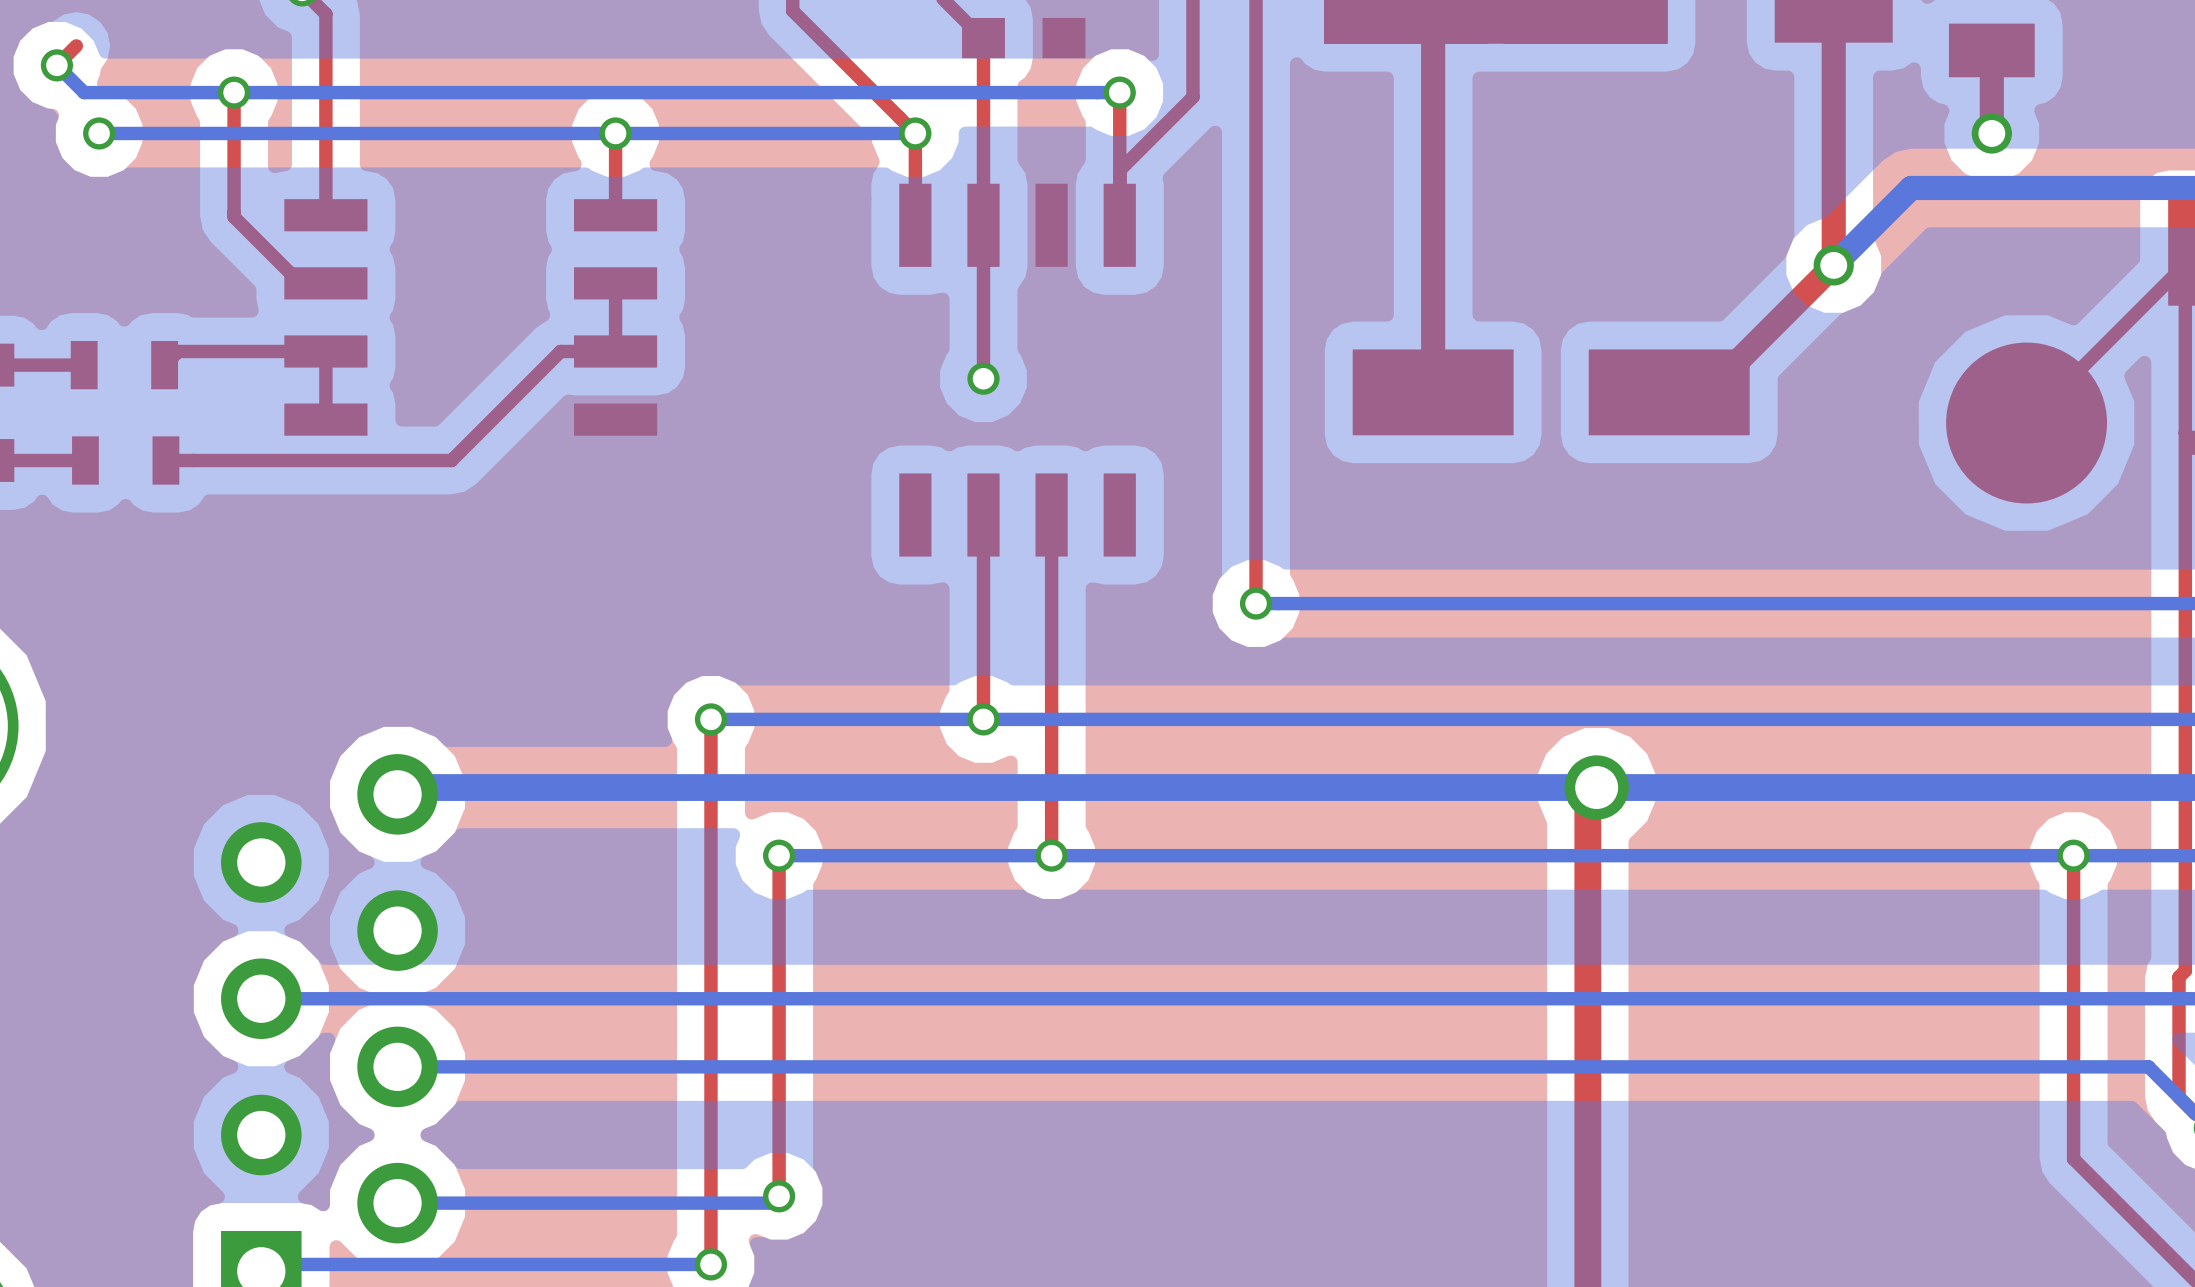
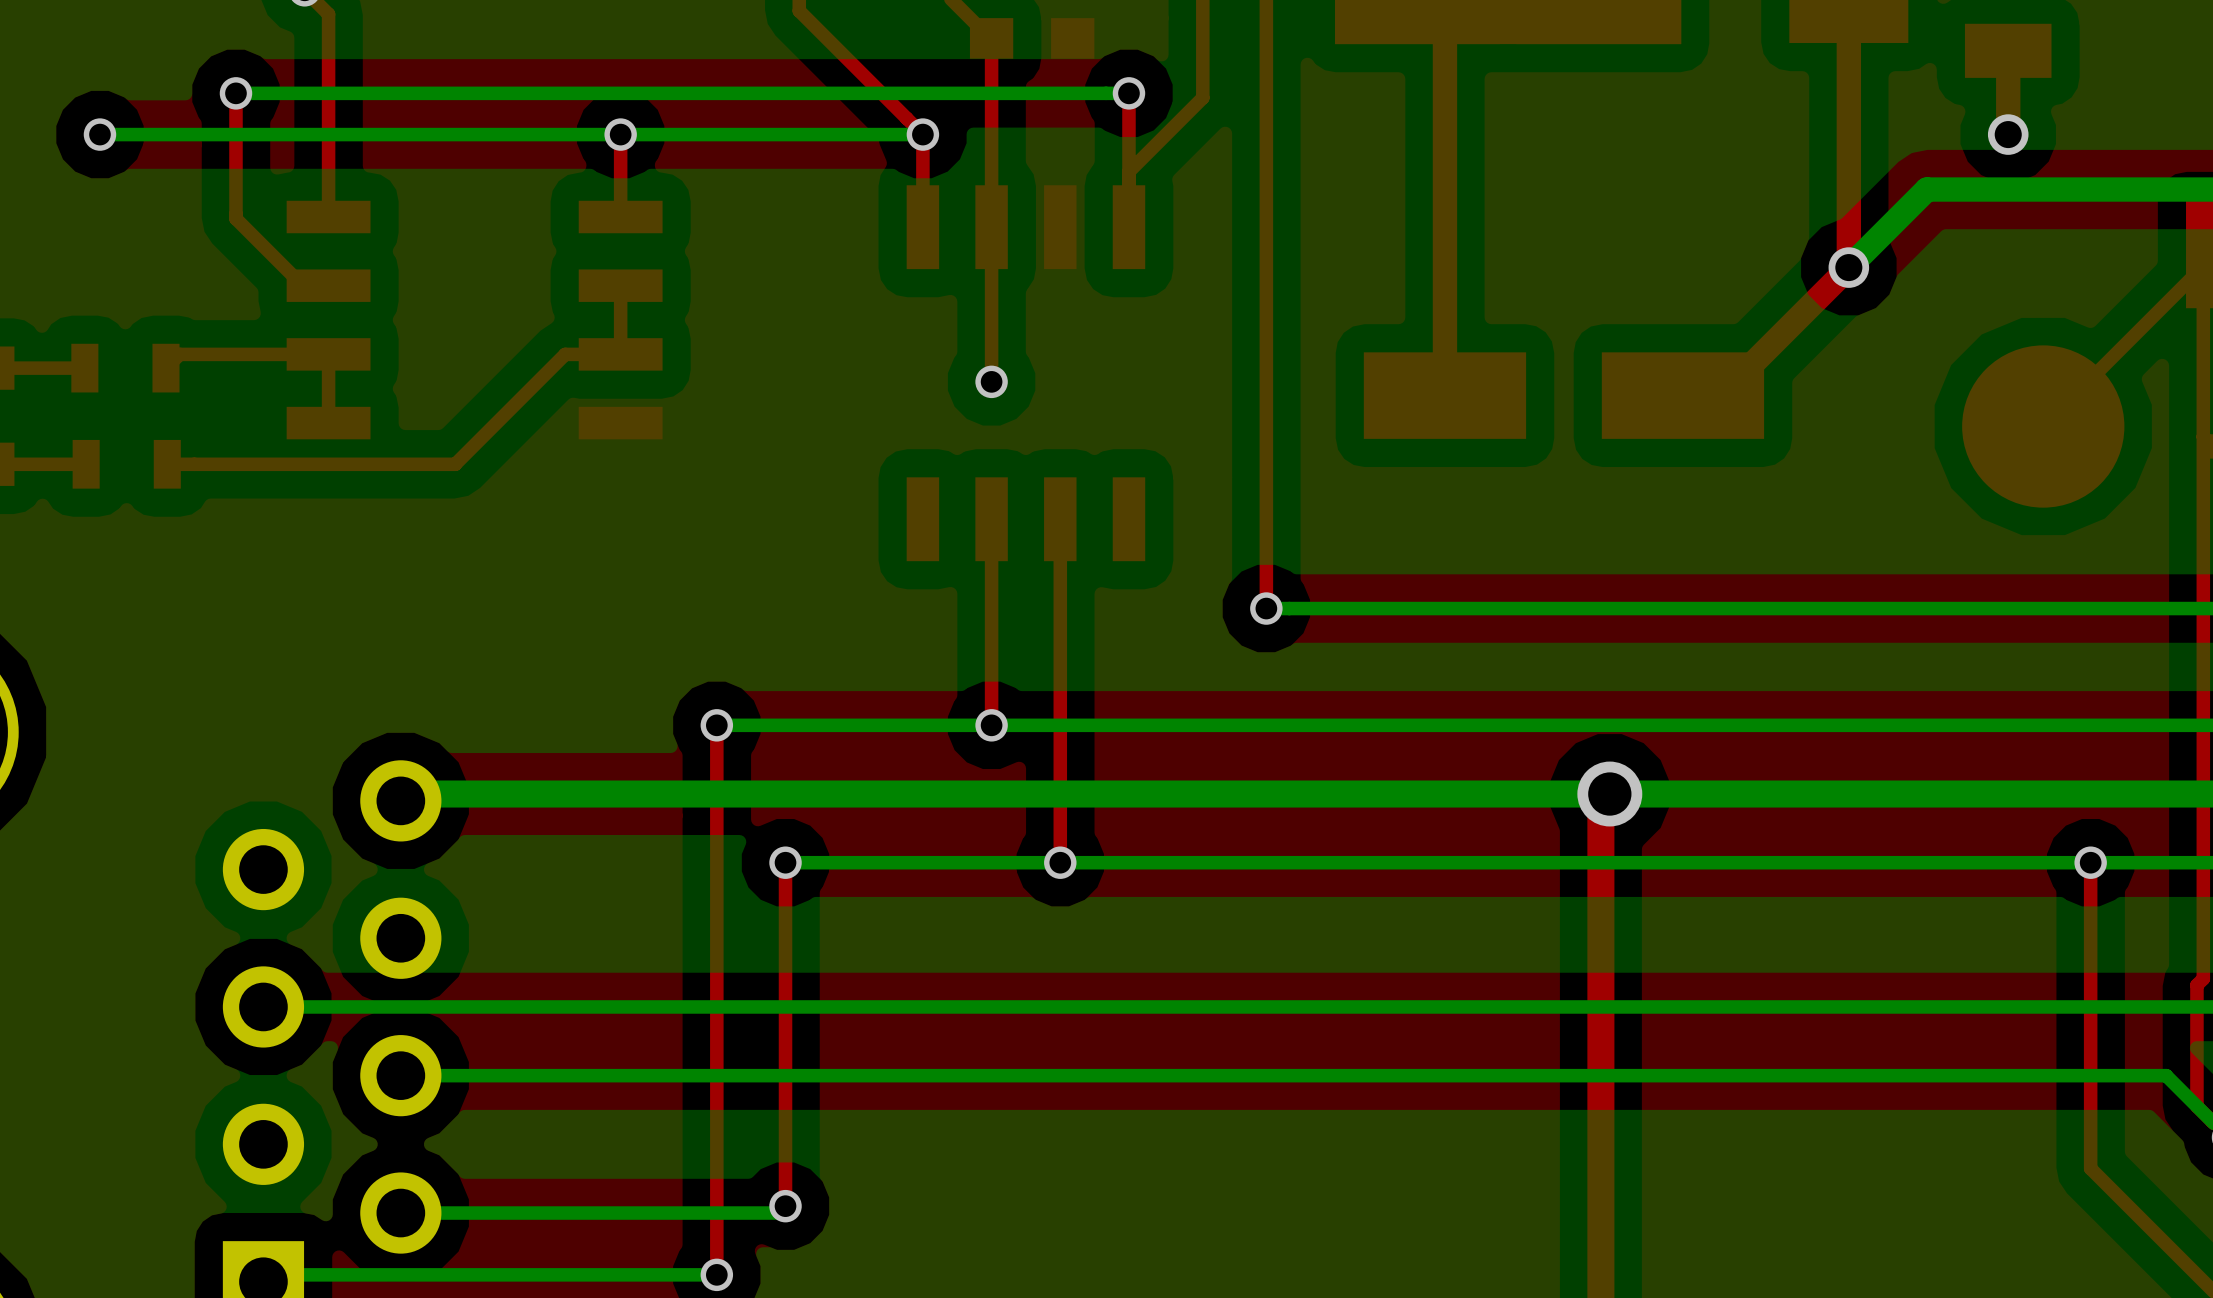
top track: (76, 45) (56, 65) -> none
bottom track: (56, 65) (84, 92) (234, 92) -> none
via: (56, 65) -> none

